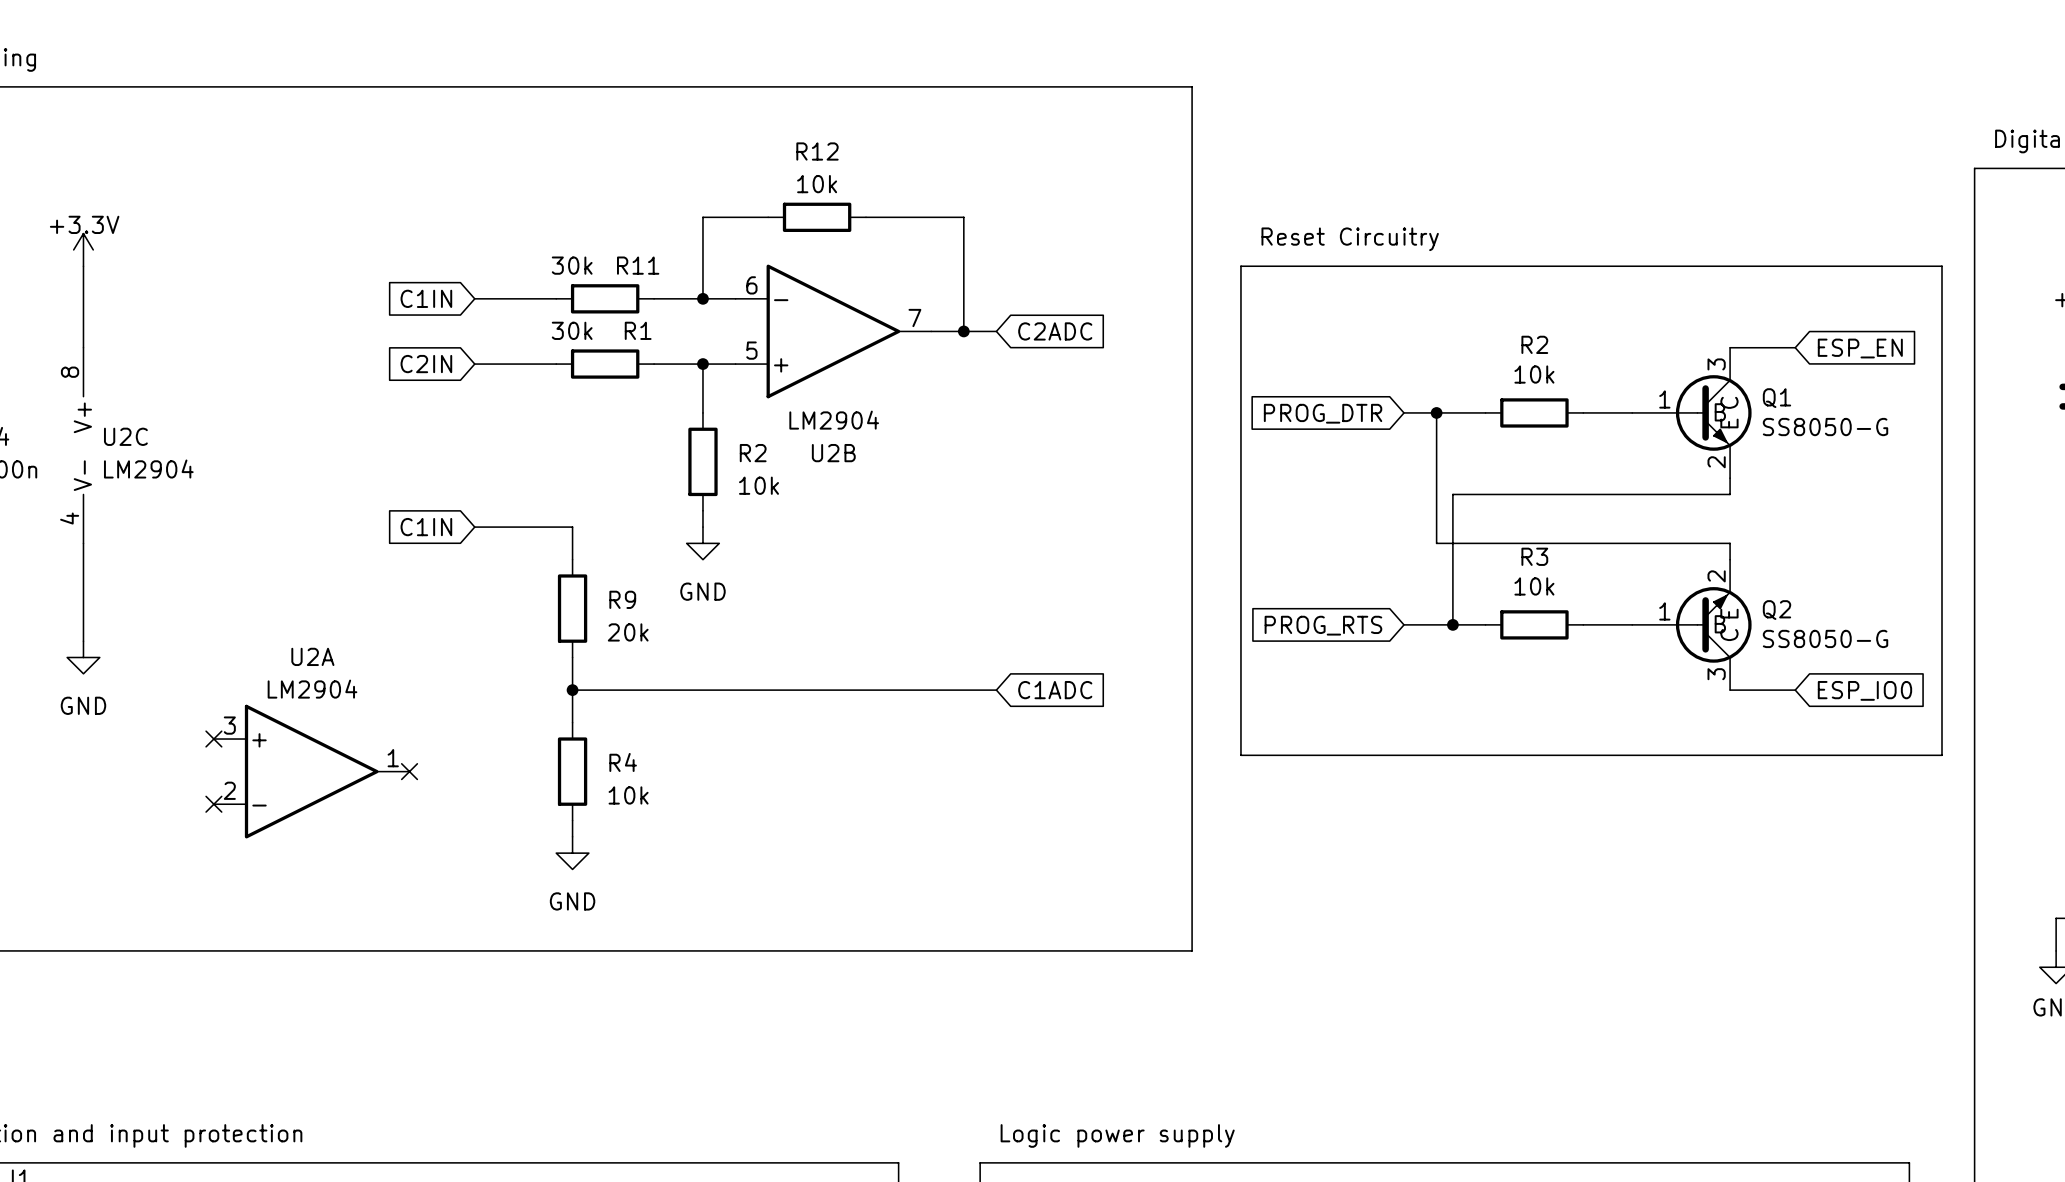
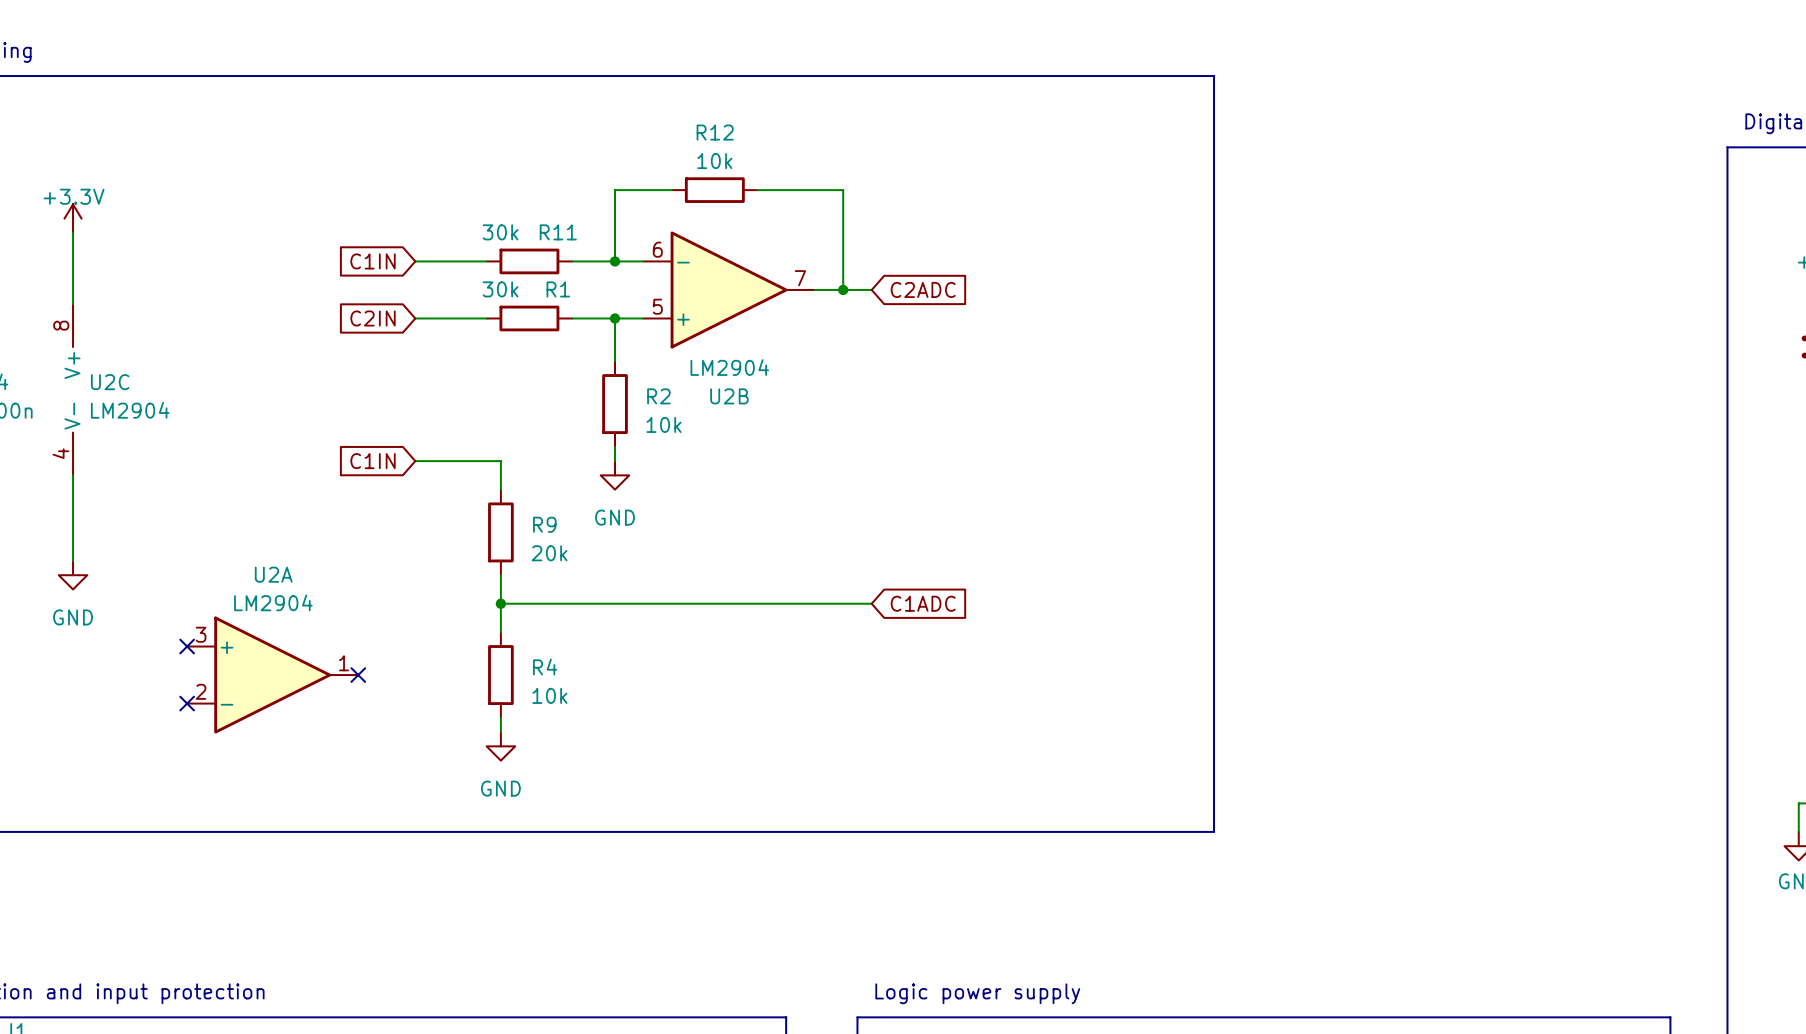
line: (1192, 86) (1192, 950) -> (1042, 76) (1214, 76) (1214, 831) (1042, 831)
text: Reset Circuitry (1350, 239) -> none
line: (1240, 266) (1240, 755) (1942, 755) (1942, 266) (1240, 266) -> none
wire: (1730, 347) (1795, 347) -> none
global label: ESP_EN (1860, 348) -> none
wire: (1404, 412) (1485, 412) -> none
wire: (1436, 412) (1436, 543) (1730, 543) (1730, 559) -> none
junction: (1436, 412) -> none
R2: 10k (1534, 412) -> none
wire: (1583, 412) (1632, 412) -> none
Q1: SS8050-G (1691, 412) -> none
global label: PROG_DTR (1323, 413) -> none
wire: (1730, 478) (1730, 494) (1452, 494) (1452, 624) -> none
wire: (1404, 624) (1485, 624) -> none
junction: (1452, 624) -> none
R3: 10k (1534, 624) -> none
wire: (1583, 624) (1632, 624) -> none
Q2: SS8050-G (1691, 624) -> none
global label: PROG_RTS (1323, 625) -> none
wire: (1730, 690) (1795, 690) -> none
global label: ESP_IO0 (1864, 690) -> none

